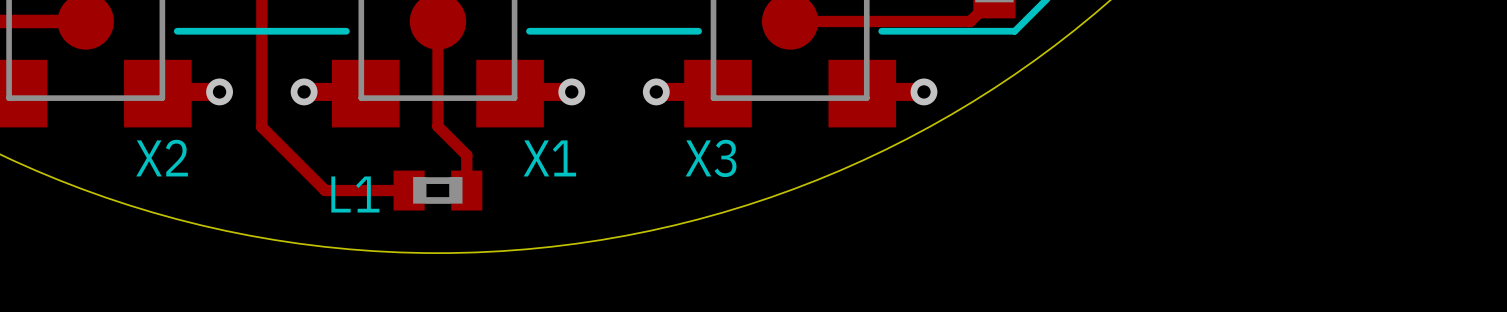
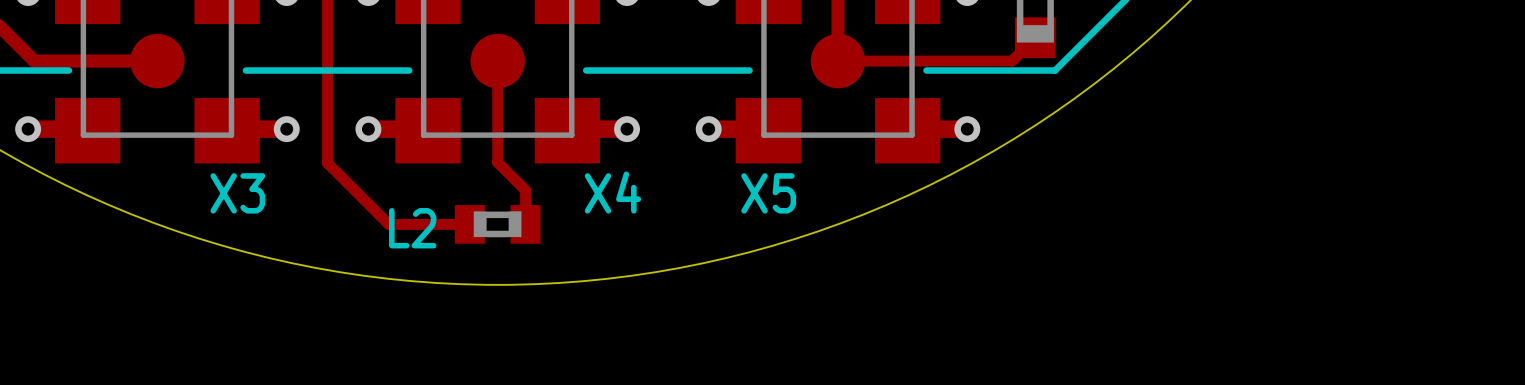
X2 name: X2 (162, 158) -> X3 (237, 193)
X1 name: X1 (549, 158) -> X4 (612, 192)
X3 name: X3 (711, 158) -> X5 (768, 193)
L1 name: L1 (355, 194) -> L2 (412, 228)

